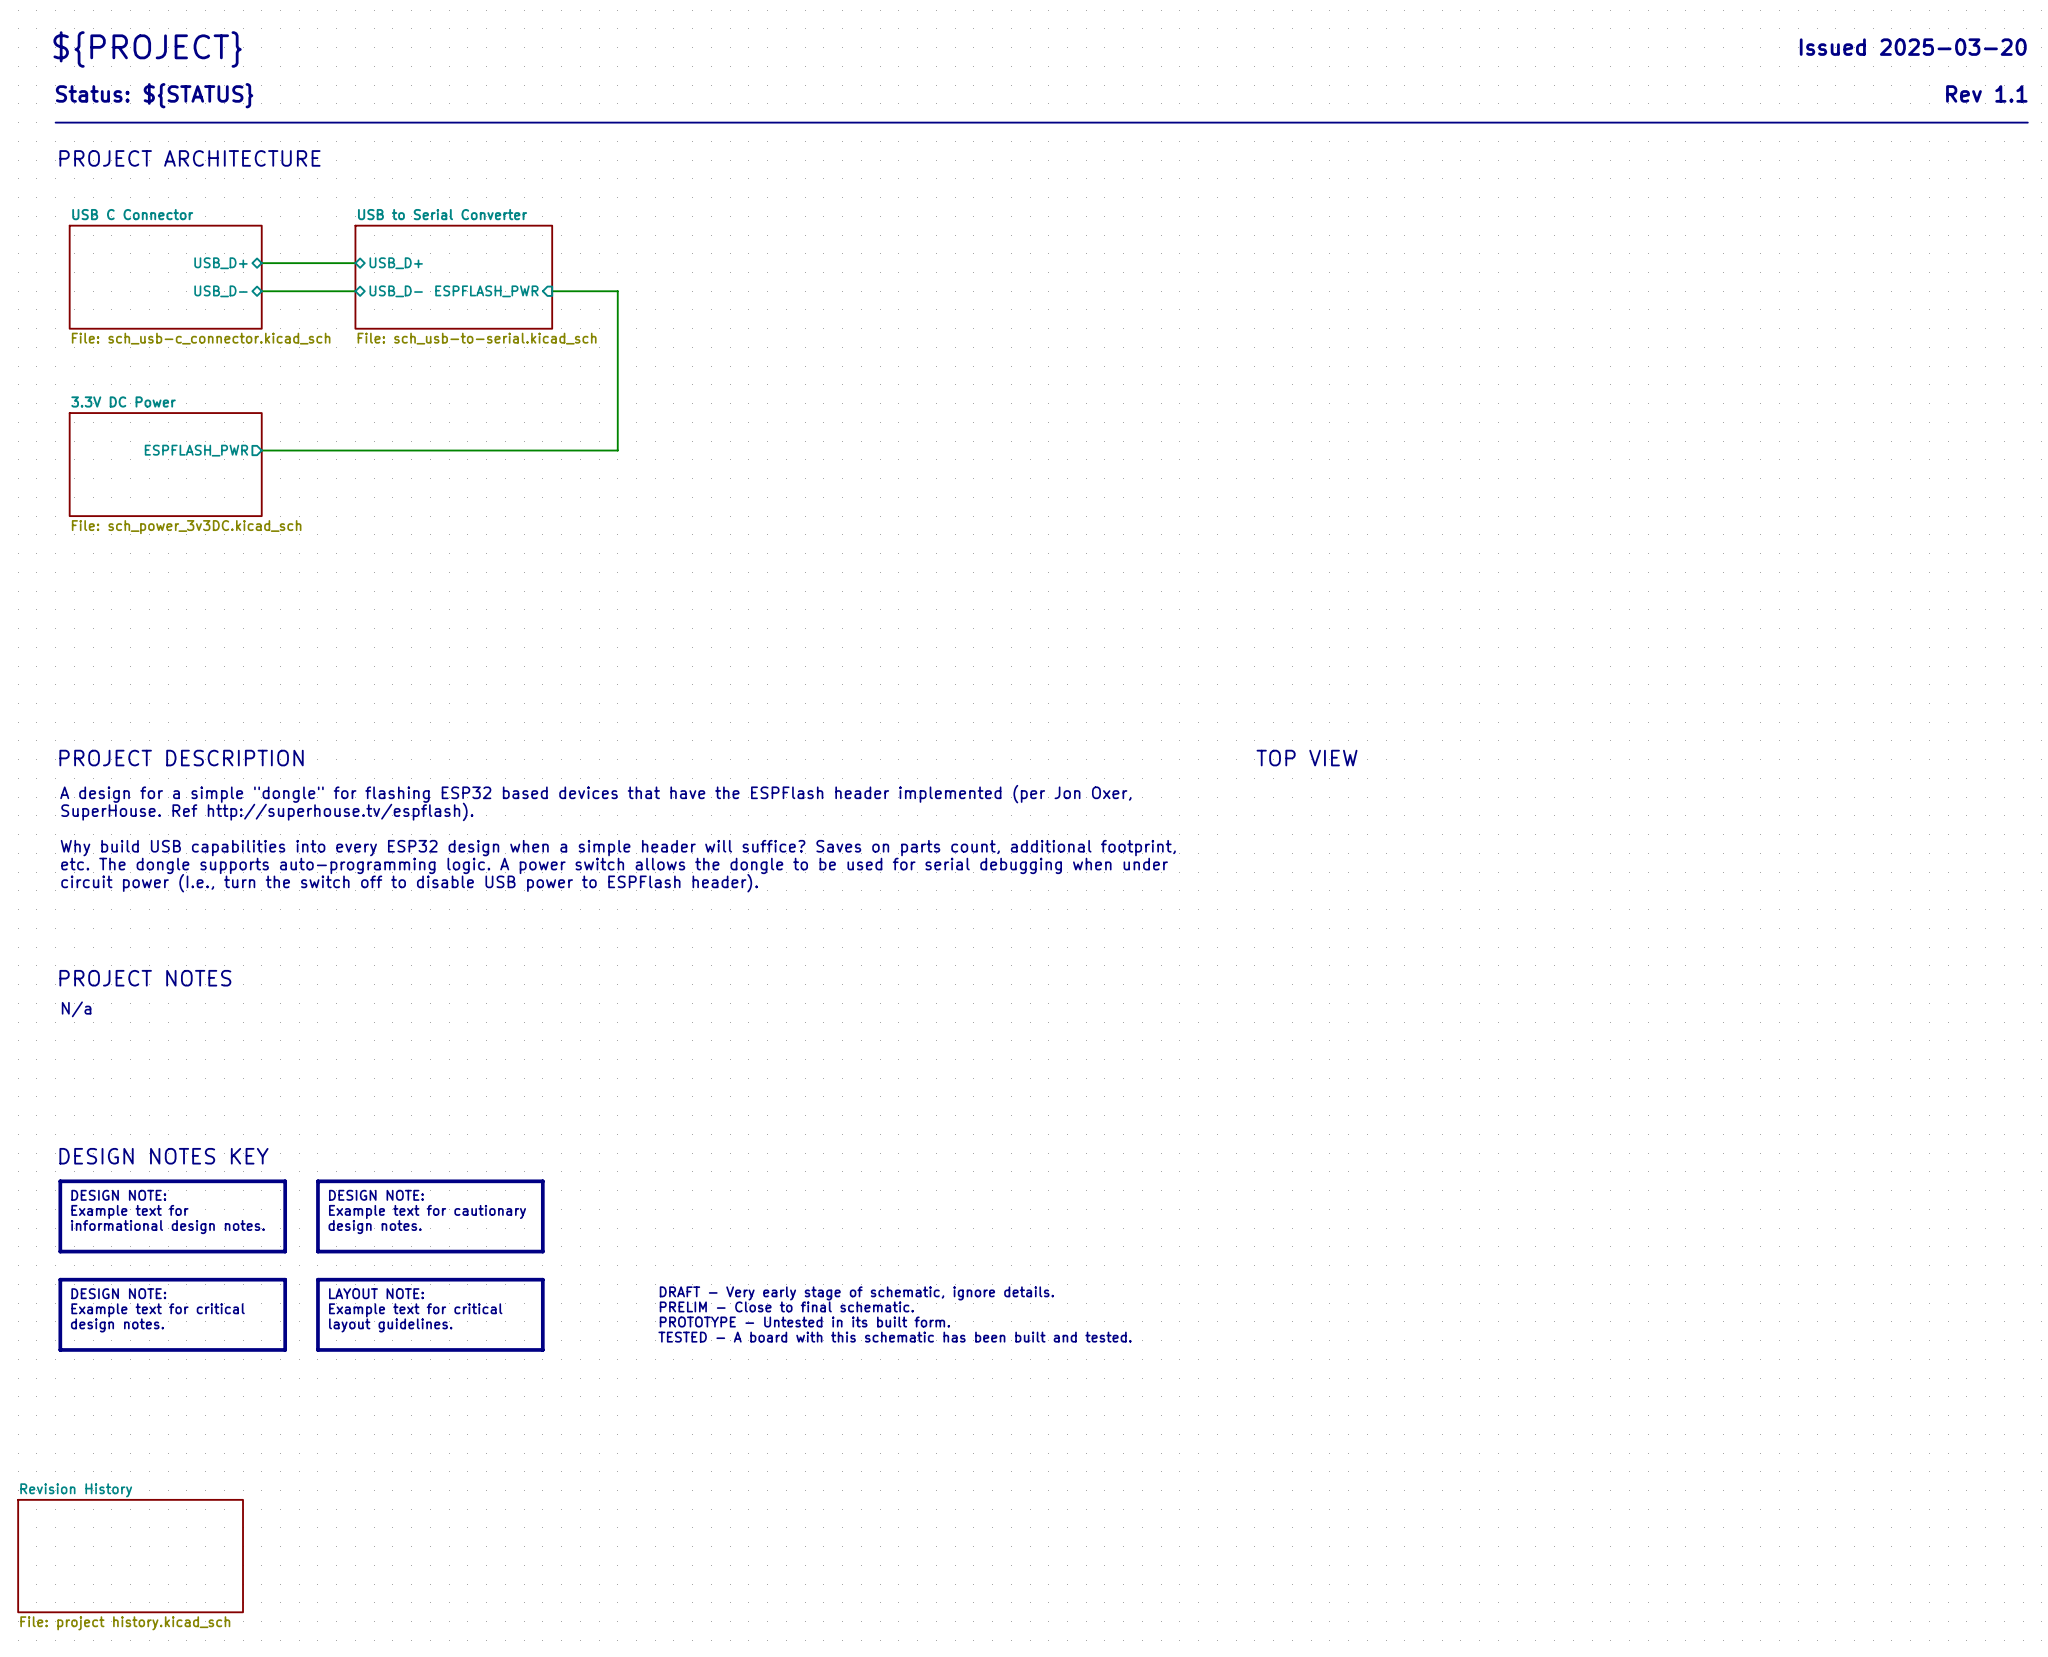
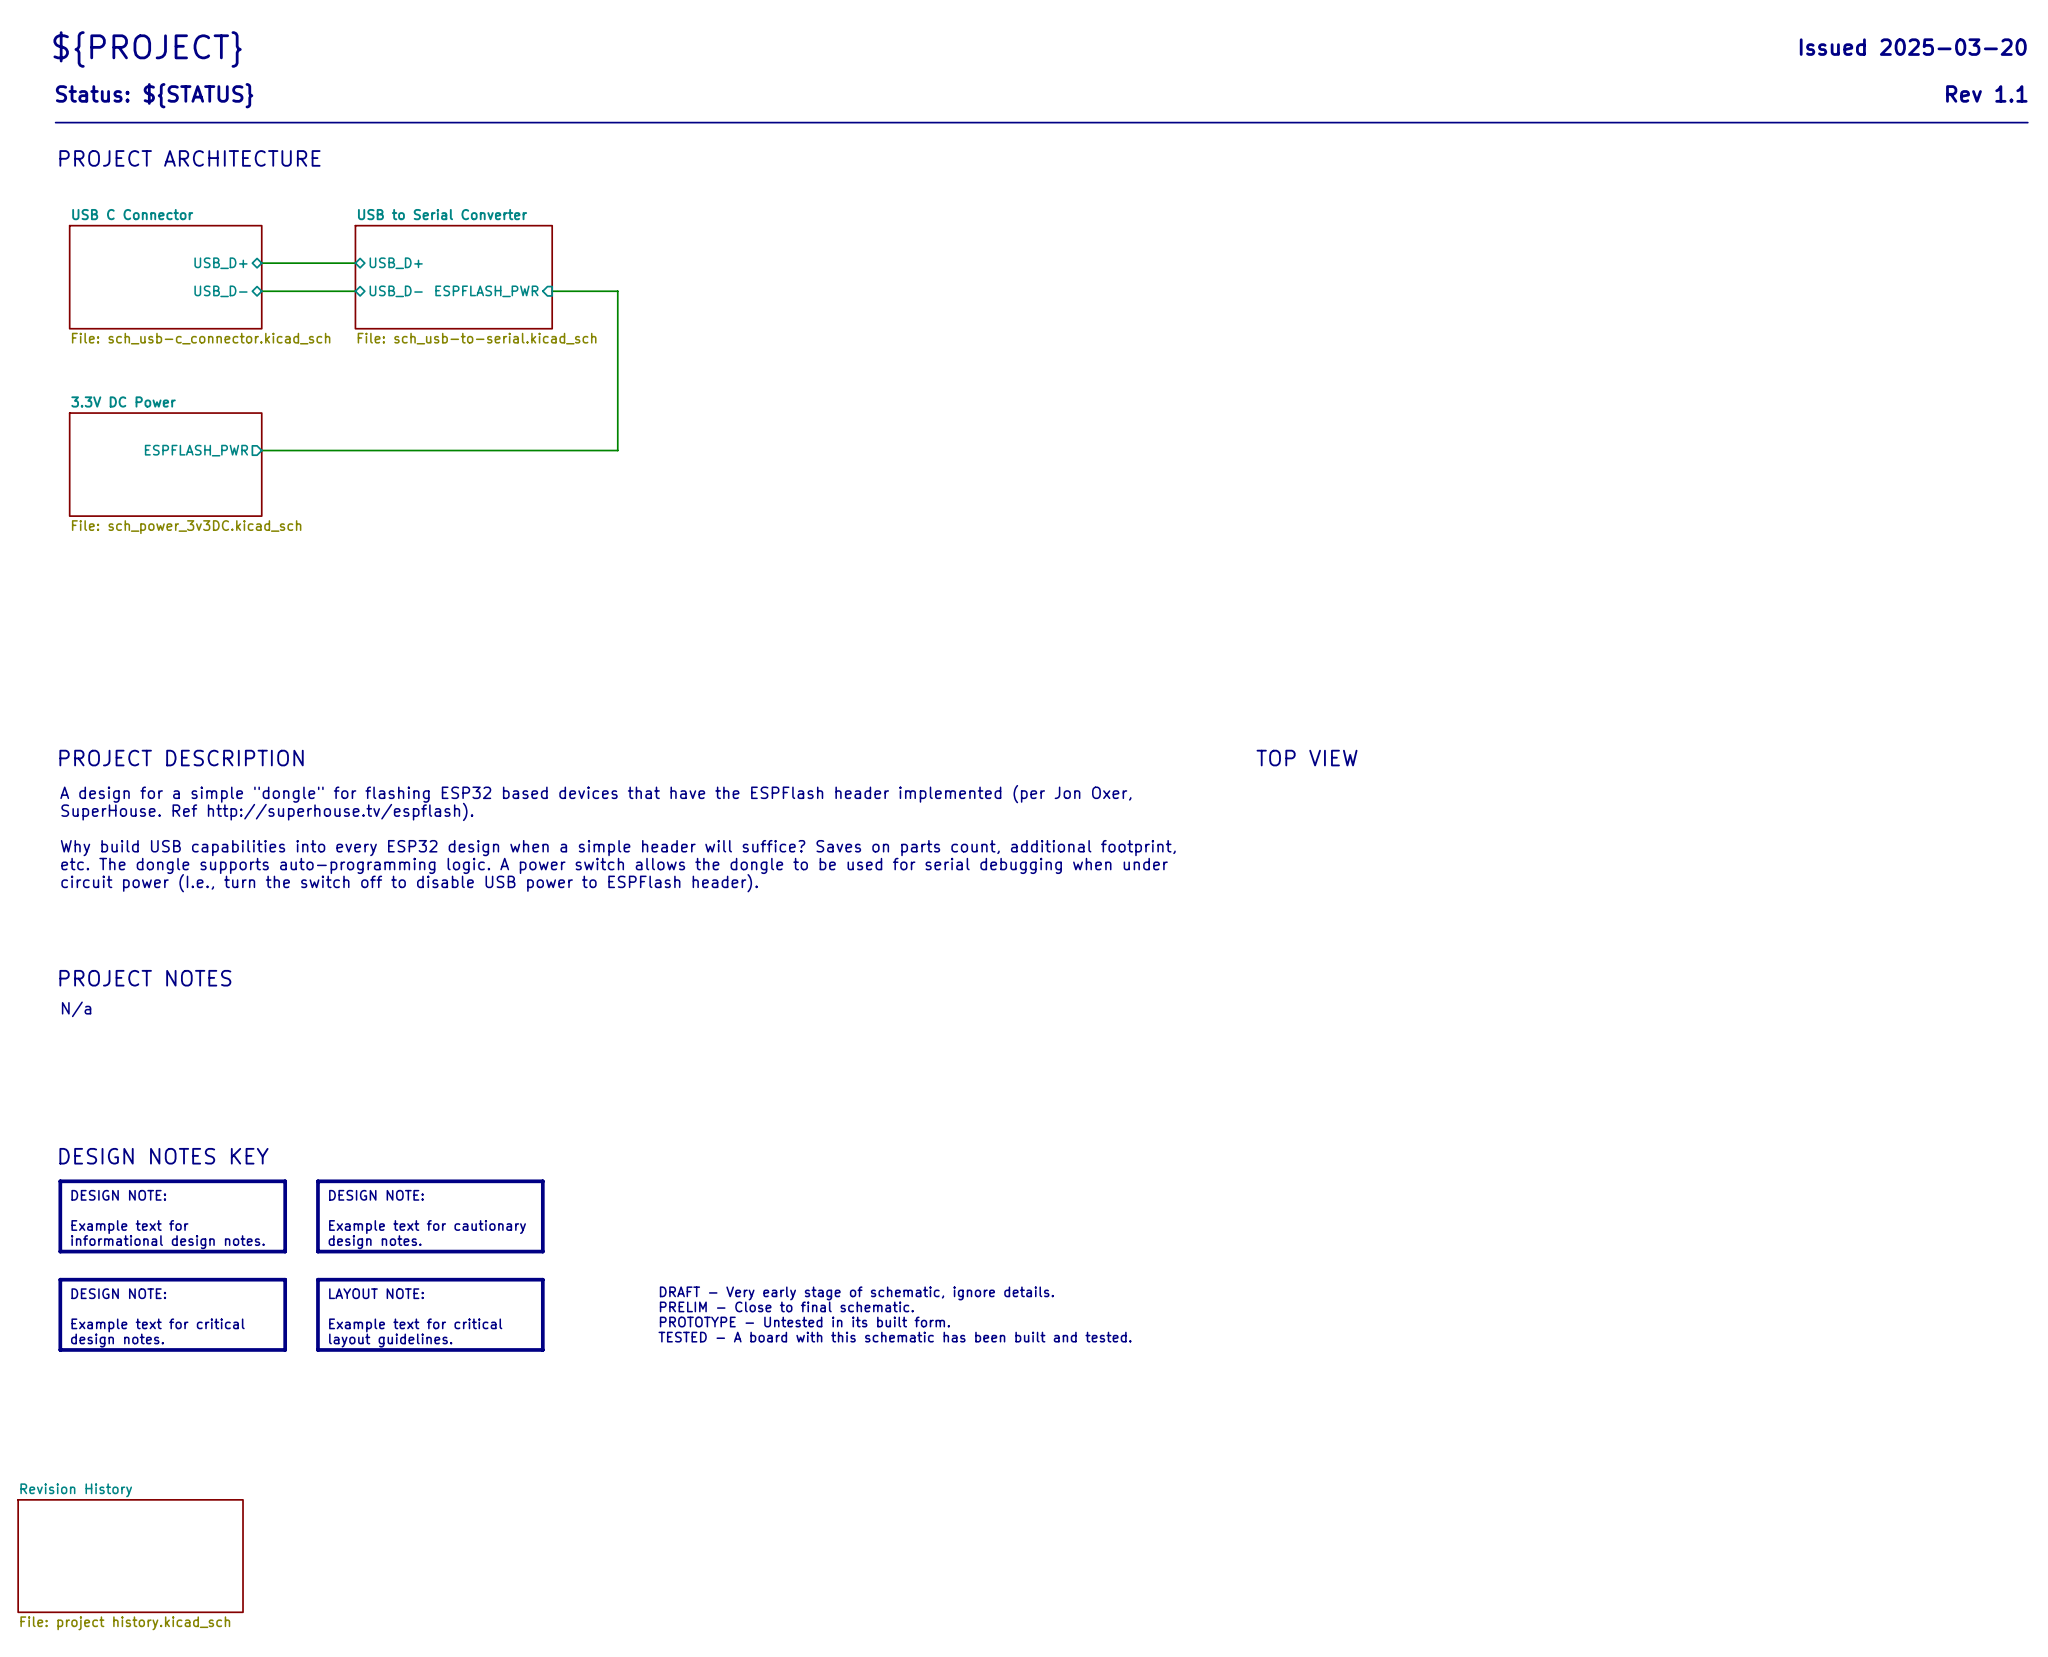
text: Example text for (129, 1211) -> none
text: Example text for cautionary (427, 1211) -> none
text: informational design notes. (167, 1227) -> Example text for (129, 1227)
text: design notes. (375, 1227) -> Example text for cautionary (427, 1227)
text: none -> informational design notes. (167, 1242)
text: none -> design notes. (375, 1242)
text: Example text for critical (158, 1310) -> none
text: Example text for critical (415, 1310) -> none
text: design notes. (117, 1325) -> Example text for critical (158, 1325)
text: layout guidelines. (390, 1325) -> Example text for critical (415, 1325)
text: none -> design notes. (117, 1340)
text: none -> layout guidelines. (390, 1340)

